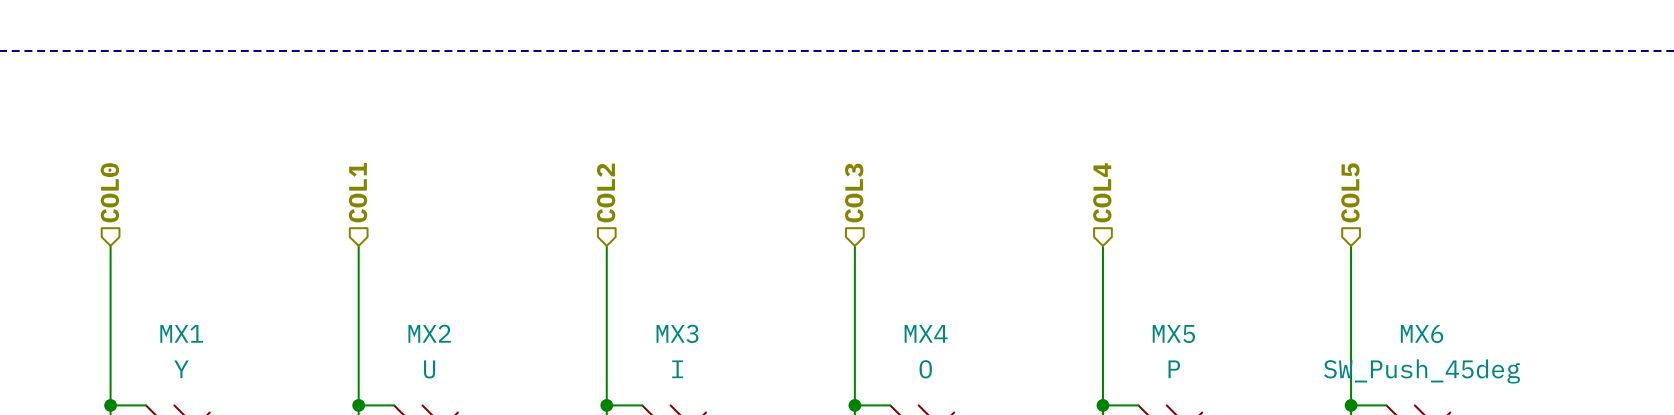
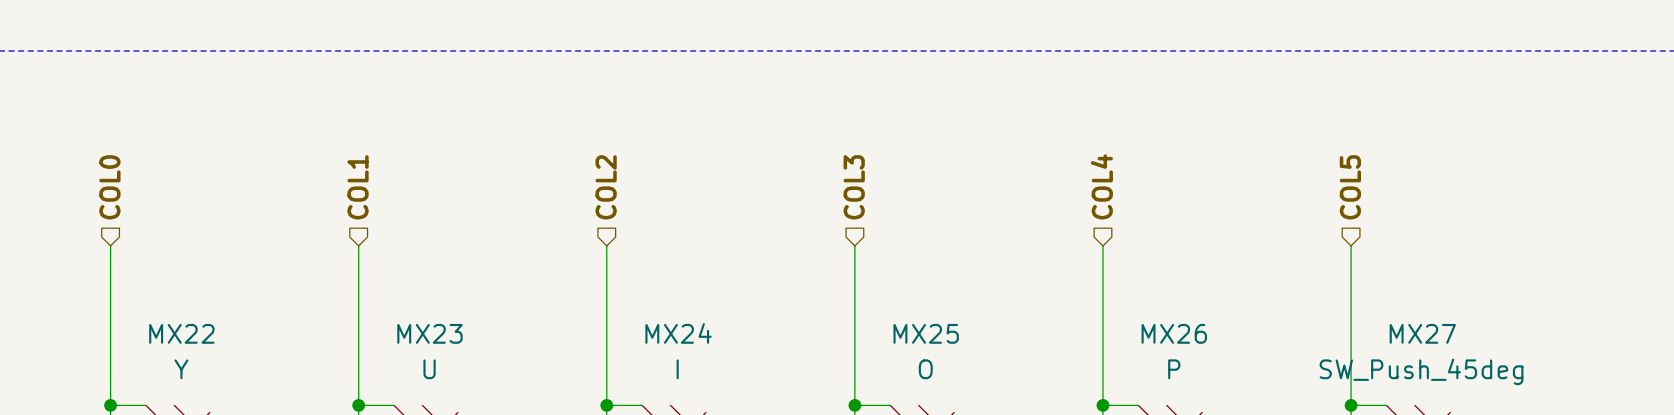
MX1 name: MX1 (181, 333) -> MX22 (181, 333)
MX2 name: MX2 (429, 333) -> MX23 (429, 333)
MX3 name: MX3 (677, 333) -> MX24 (678, 333)
MX4 name: MX4 (926, 333) -> MX25 (926, 333)
MX5 name: MX5 (1173, 334) -> MX26 (1174, 333)
MX6 name: MX6 (1422, 334) -> MX27 (1422, 333)

